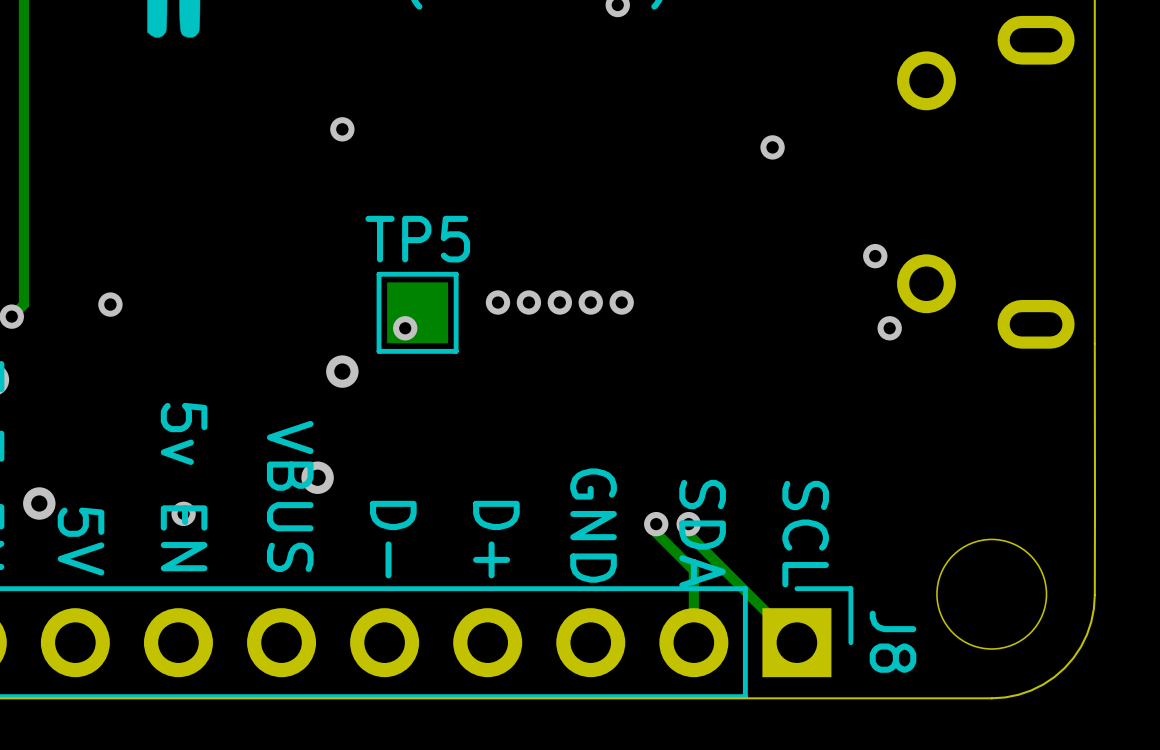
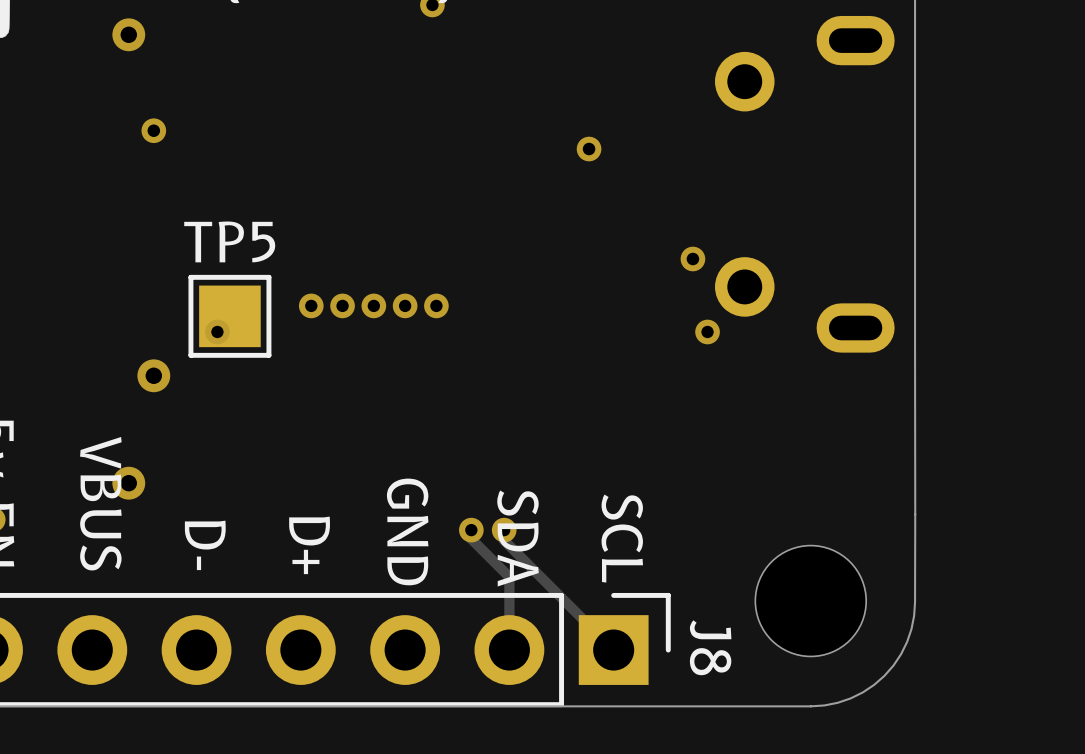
via: none -> (128, 34)

